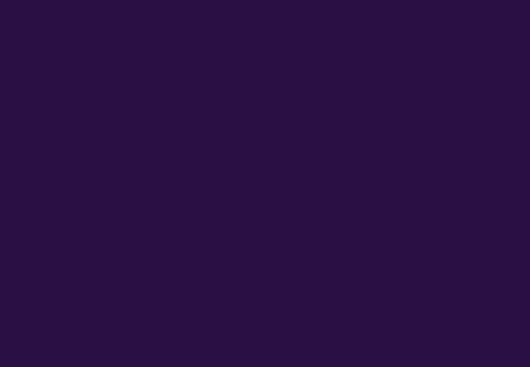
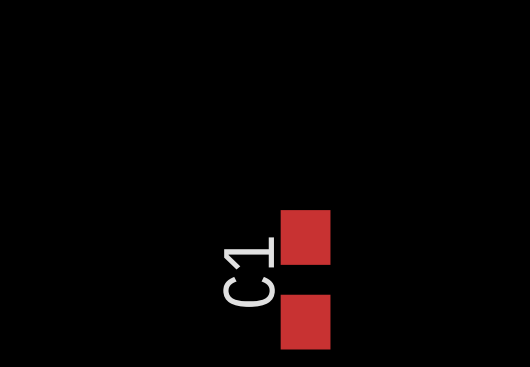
C1: none -> (305, 279)

